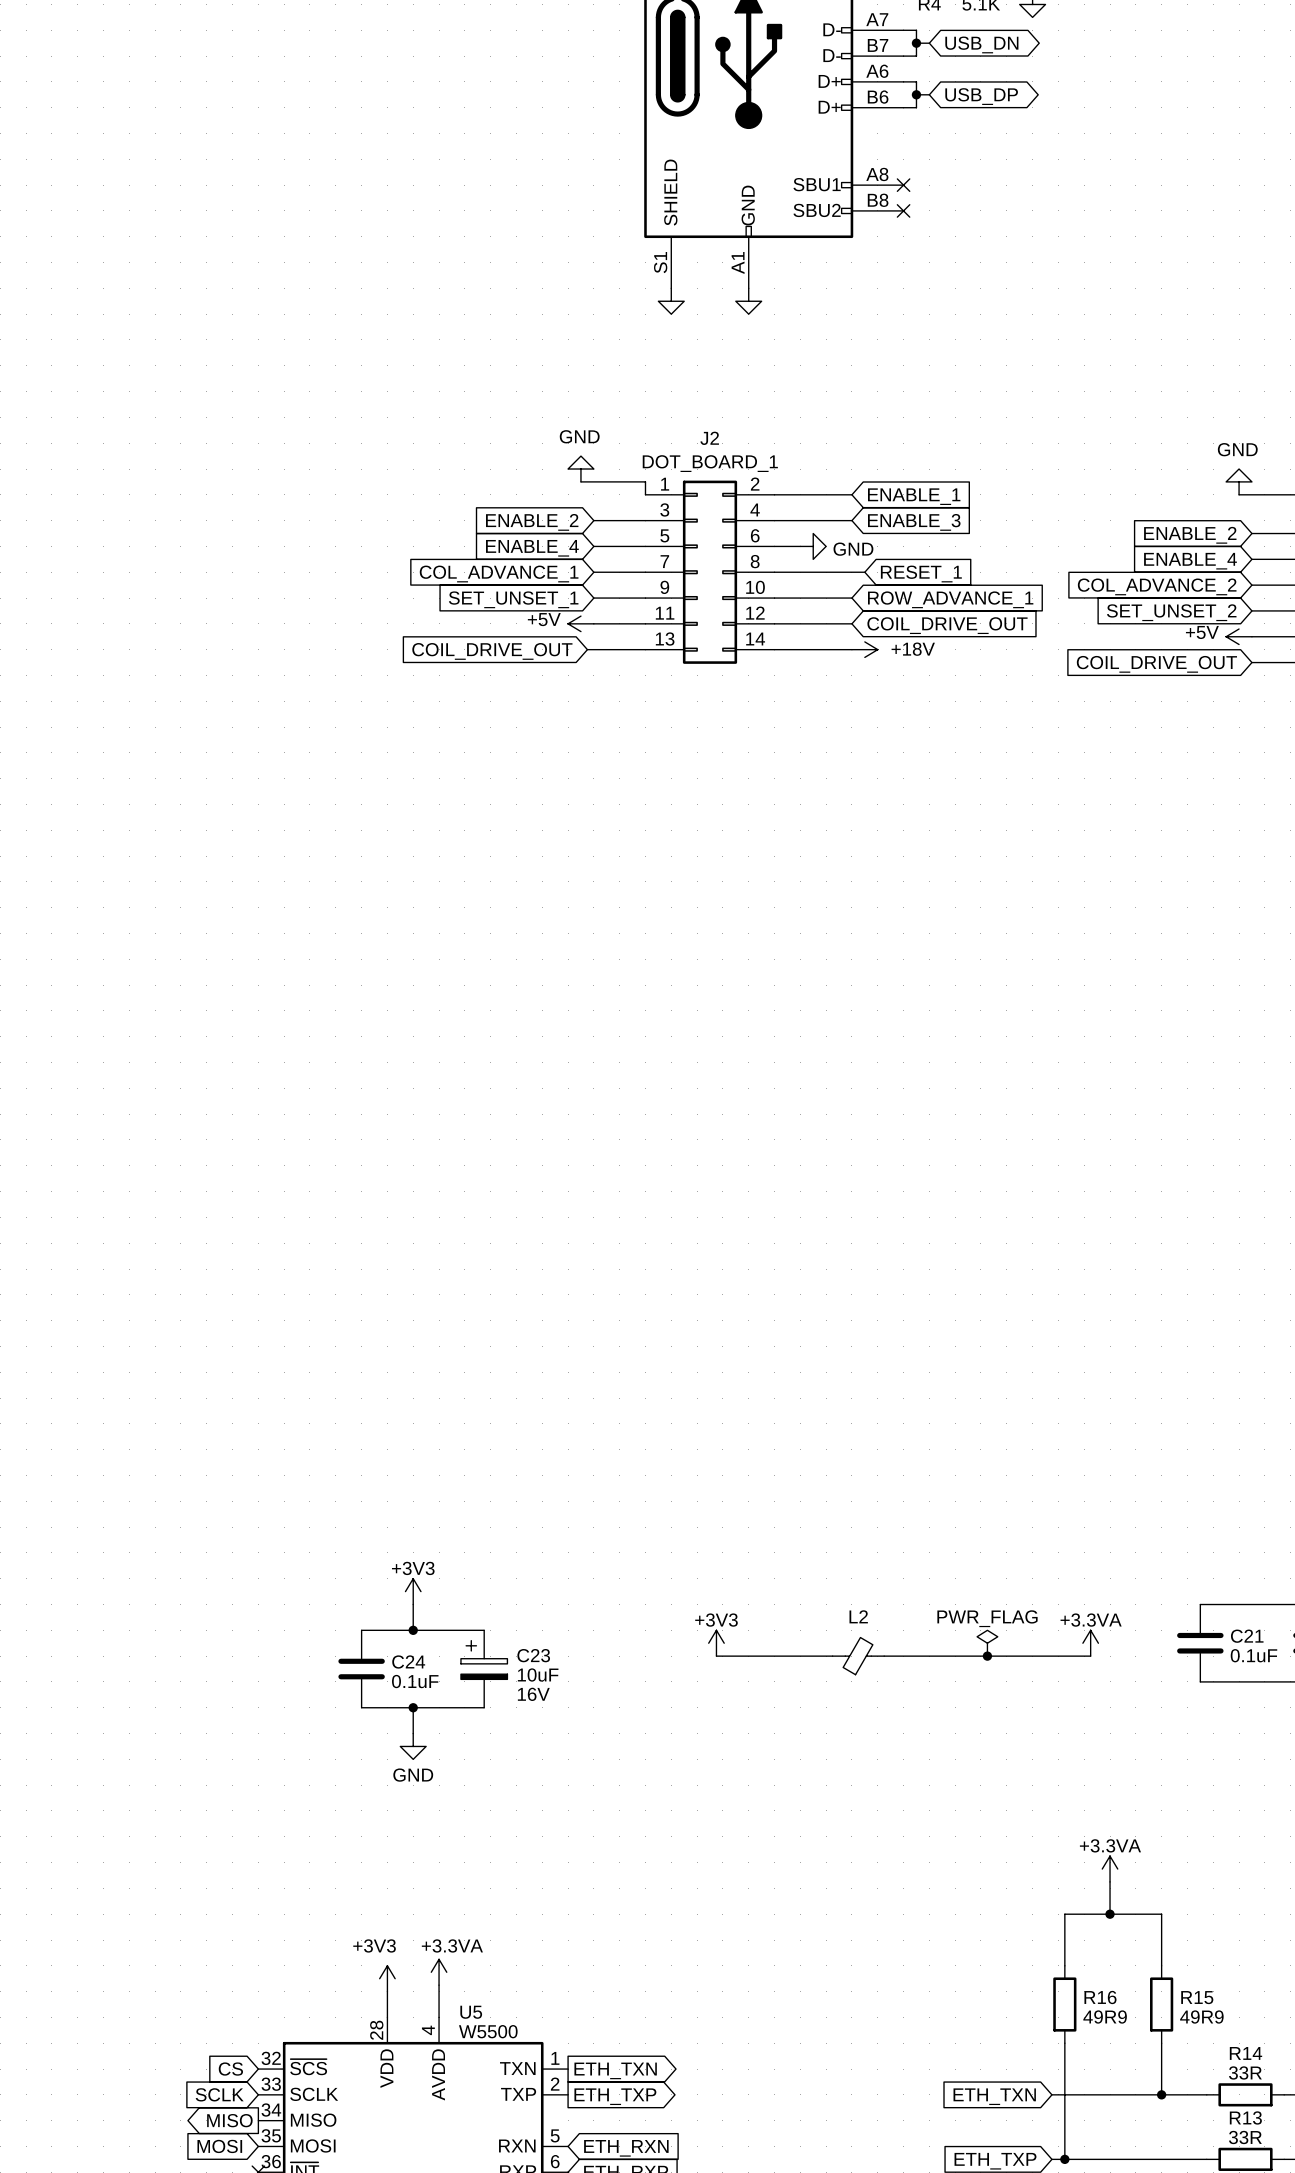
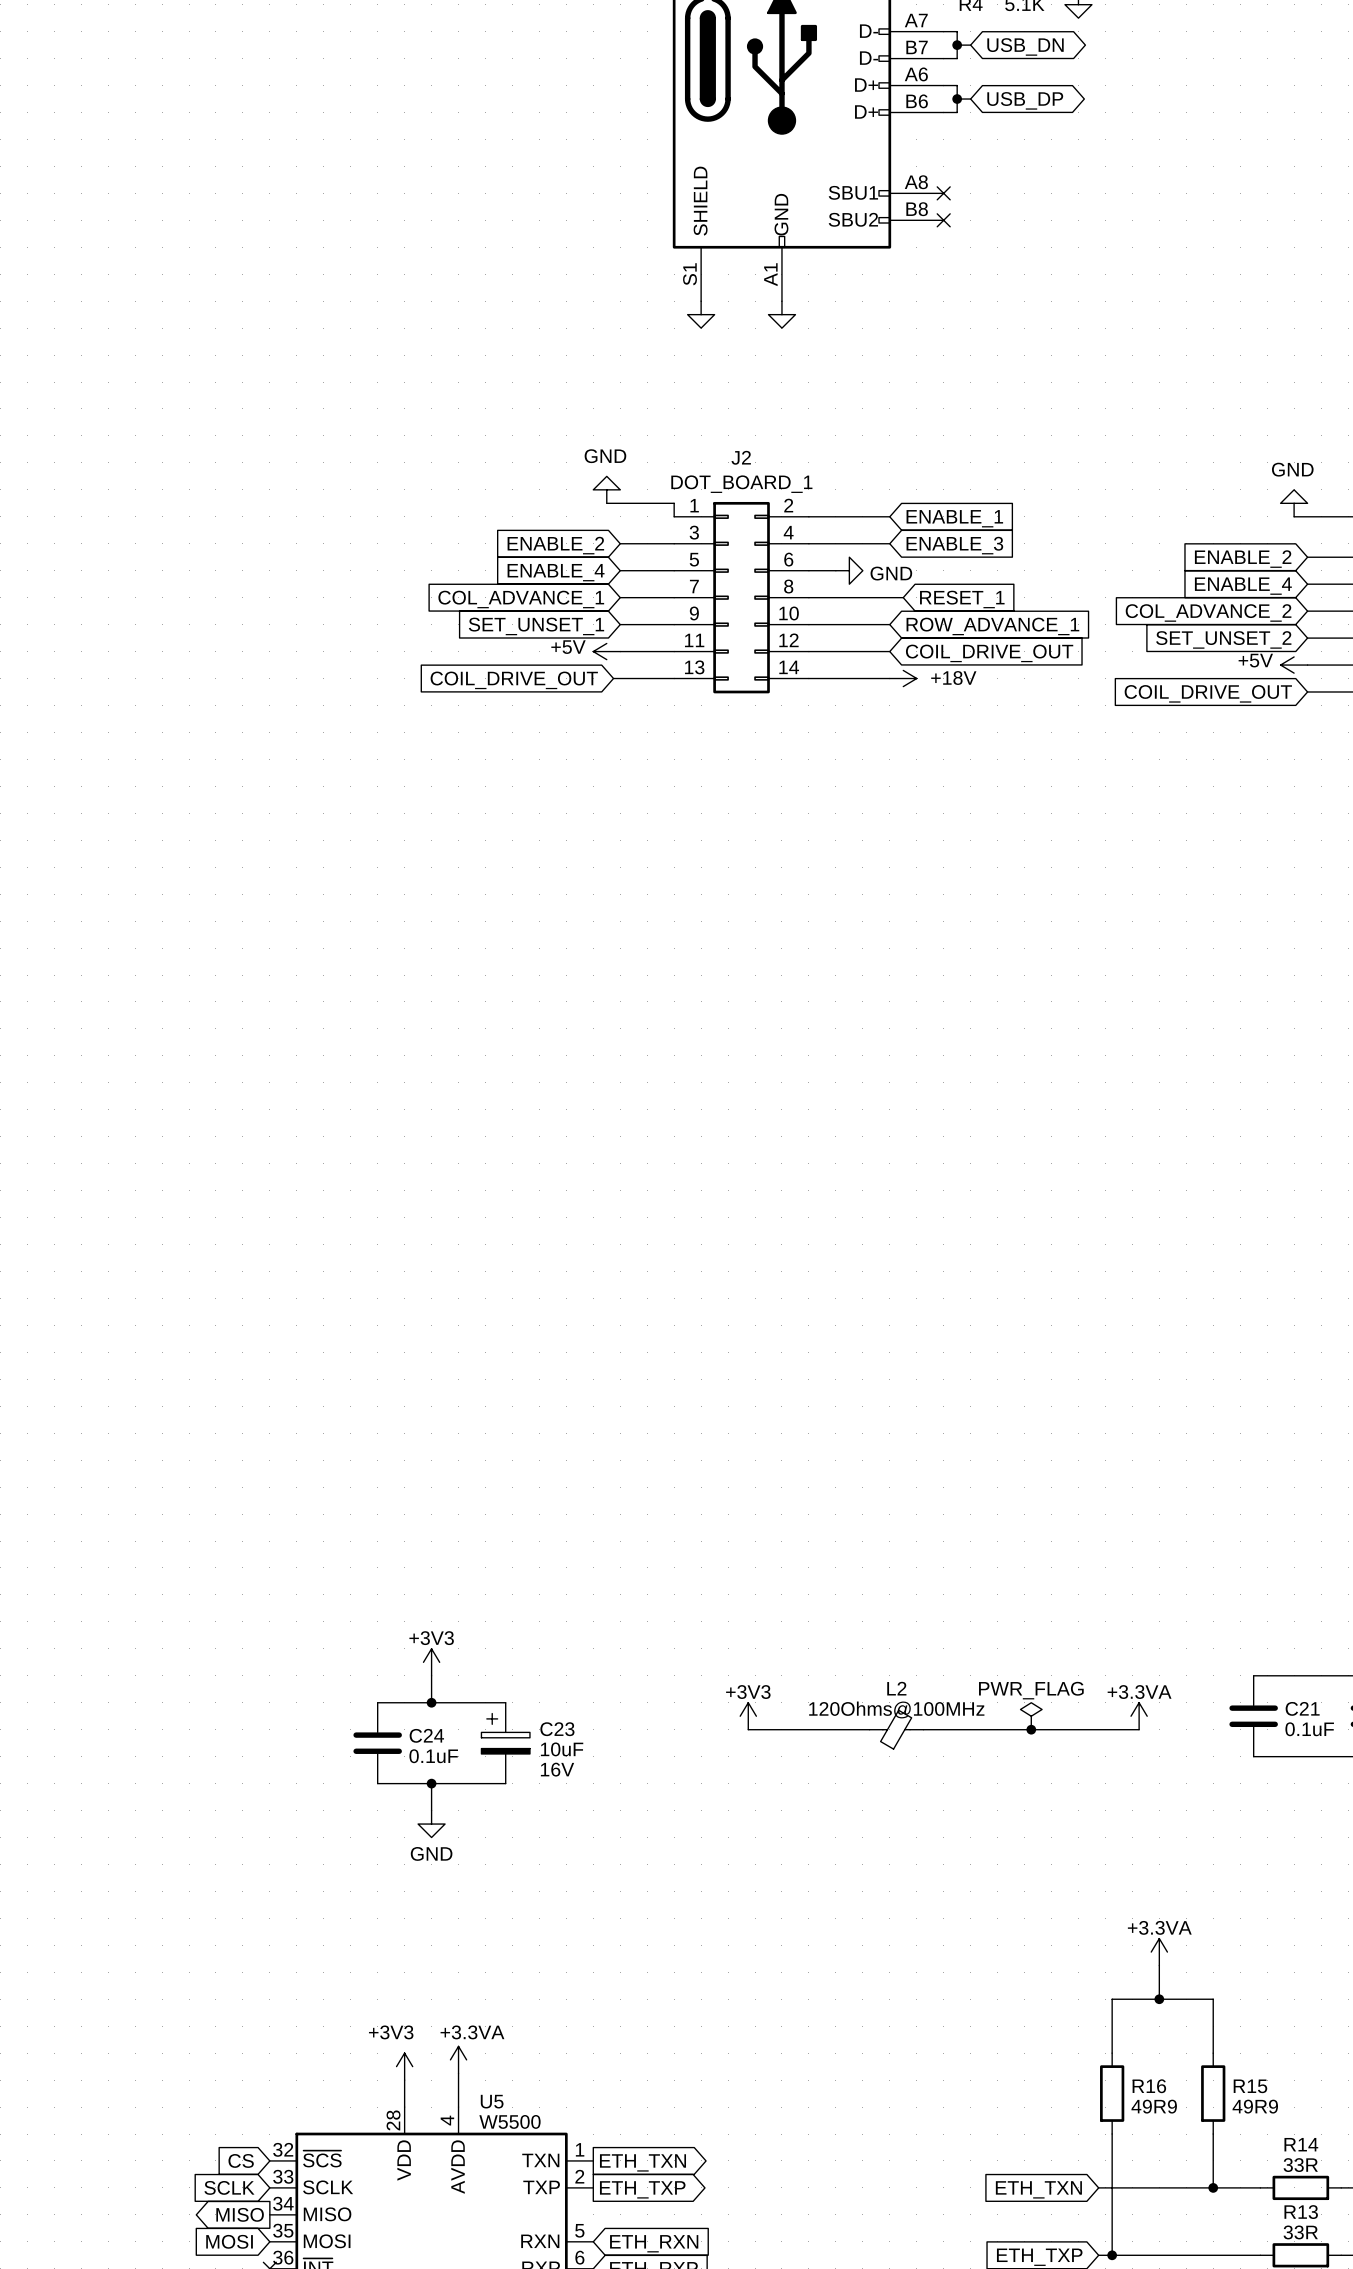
L2 value: none -> 120Ohms@100MHz (896, 1709)

